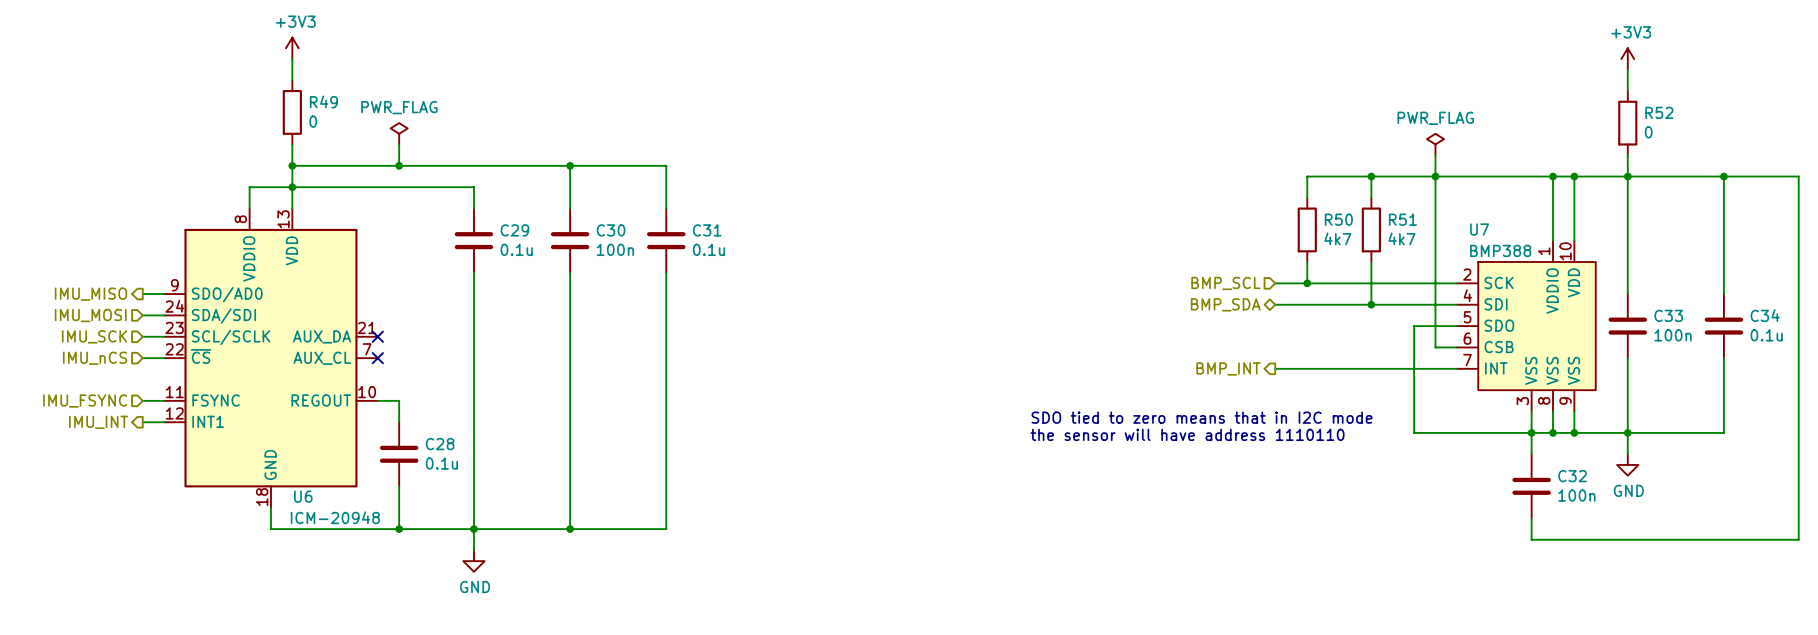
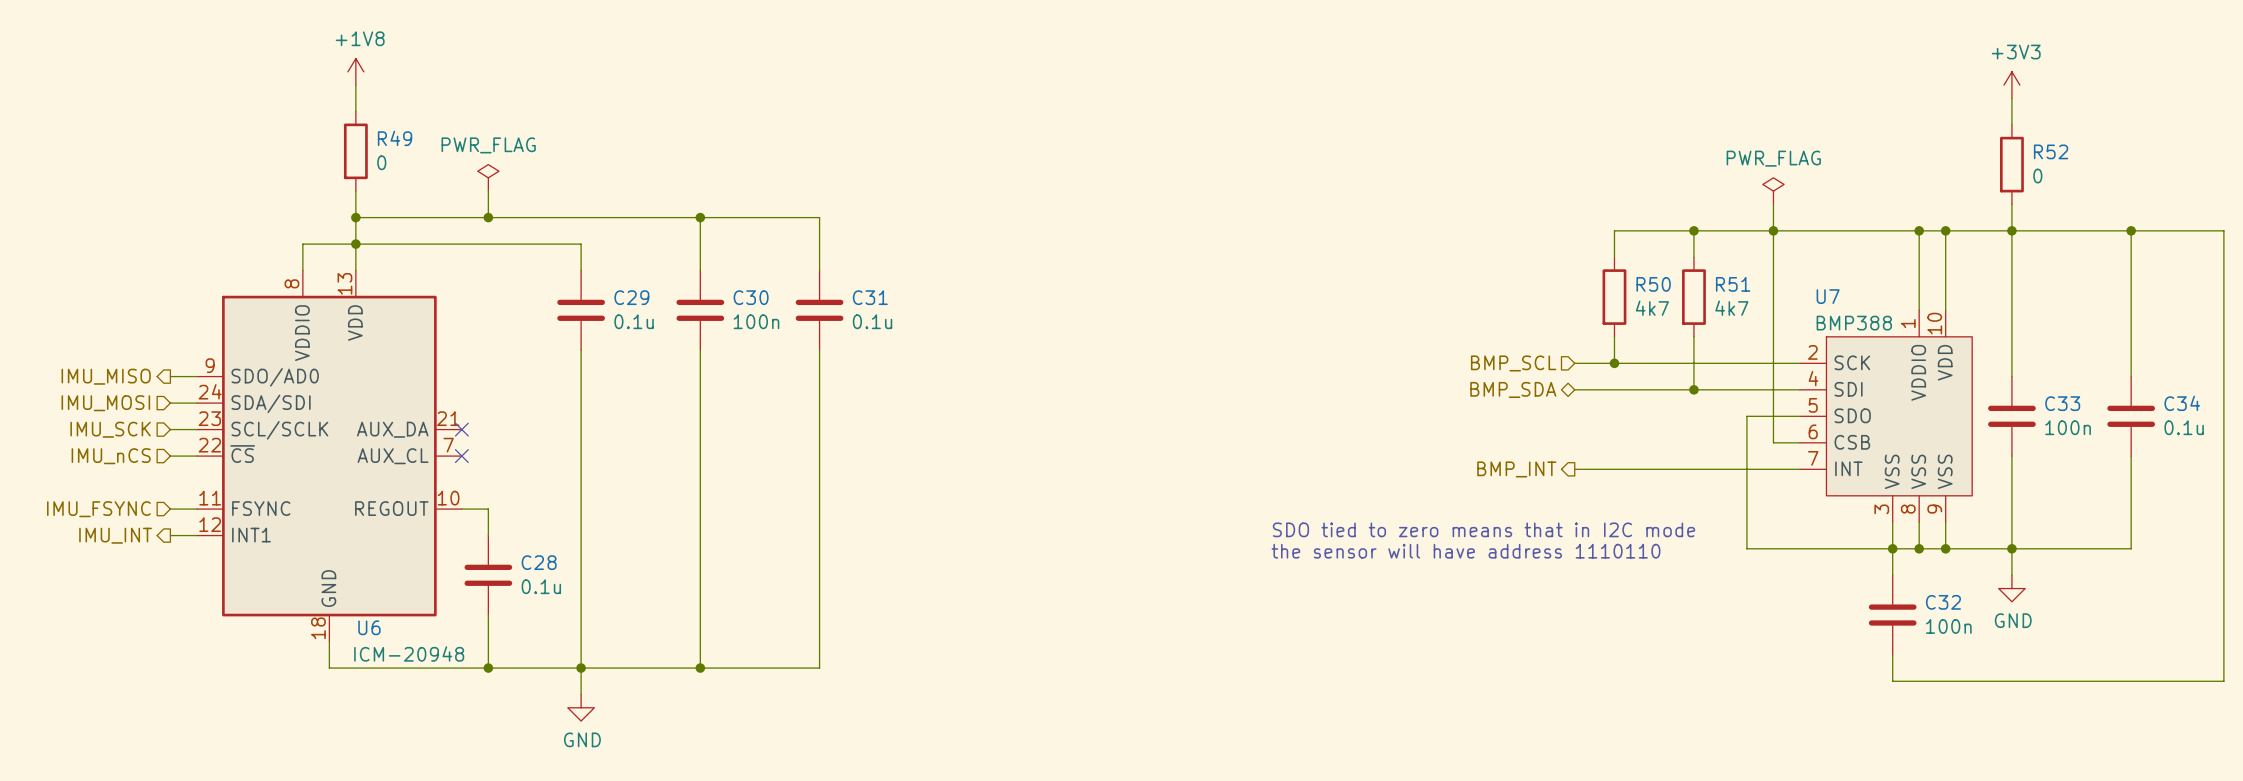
power symbol: +3V3 (292, 48) -> +1V8 (355, 71)

